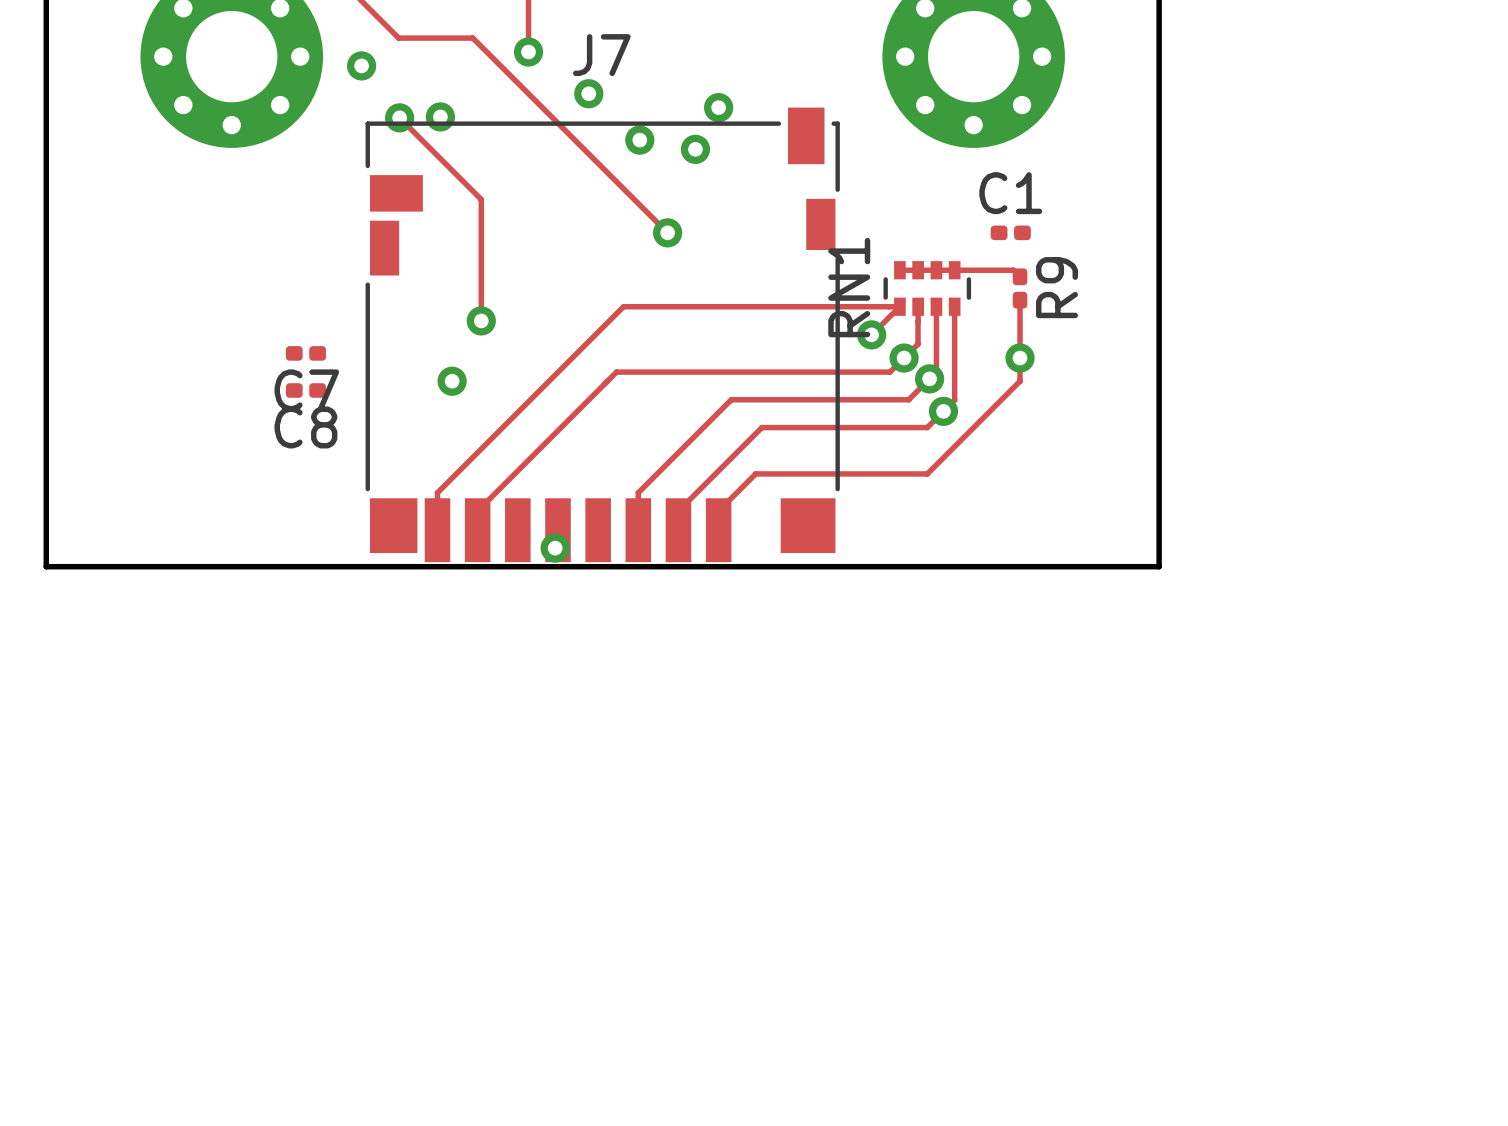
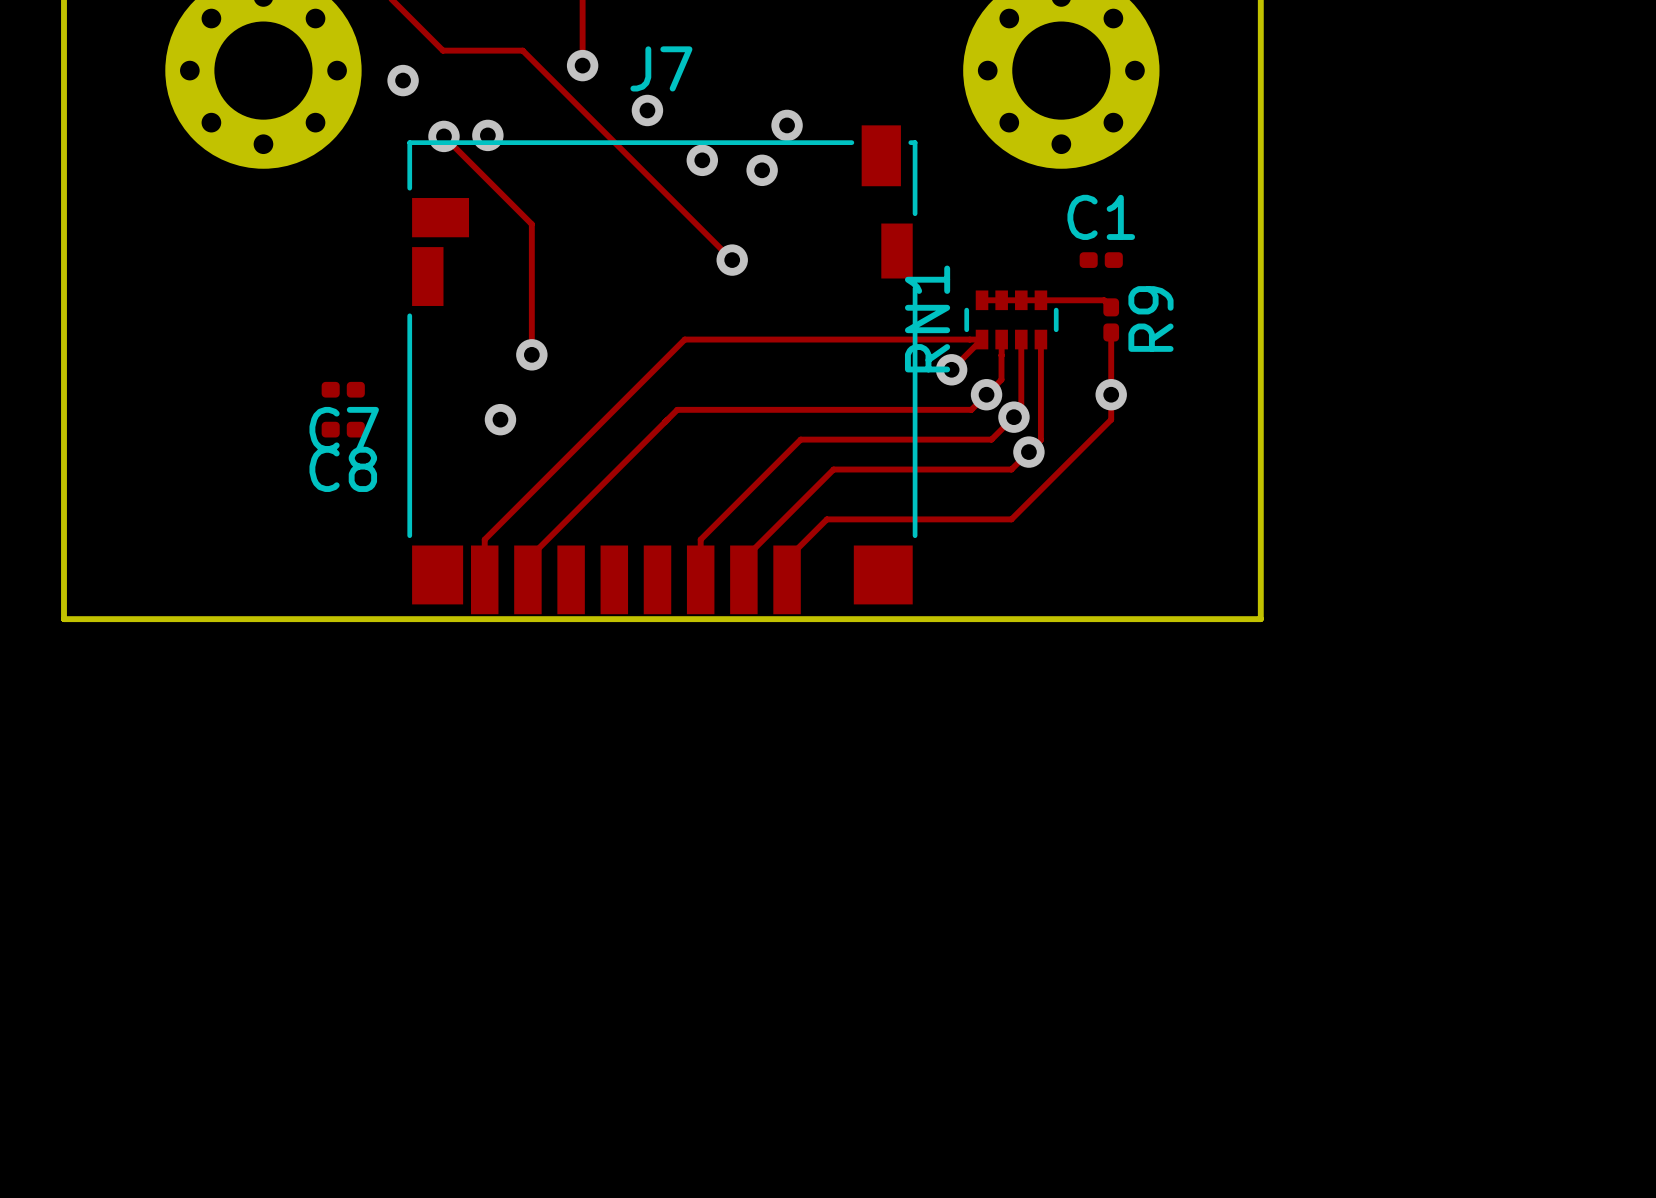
via: (555, 548) -> none

